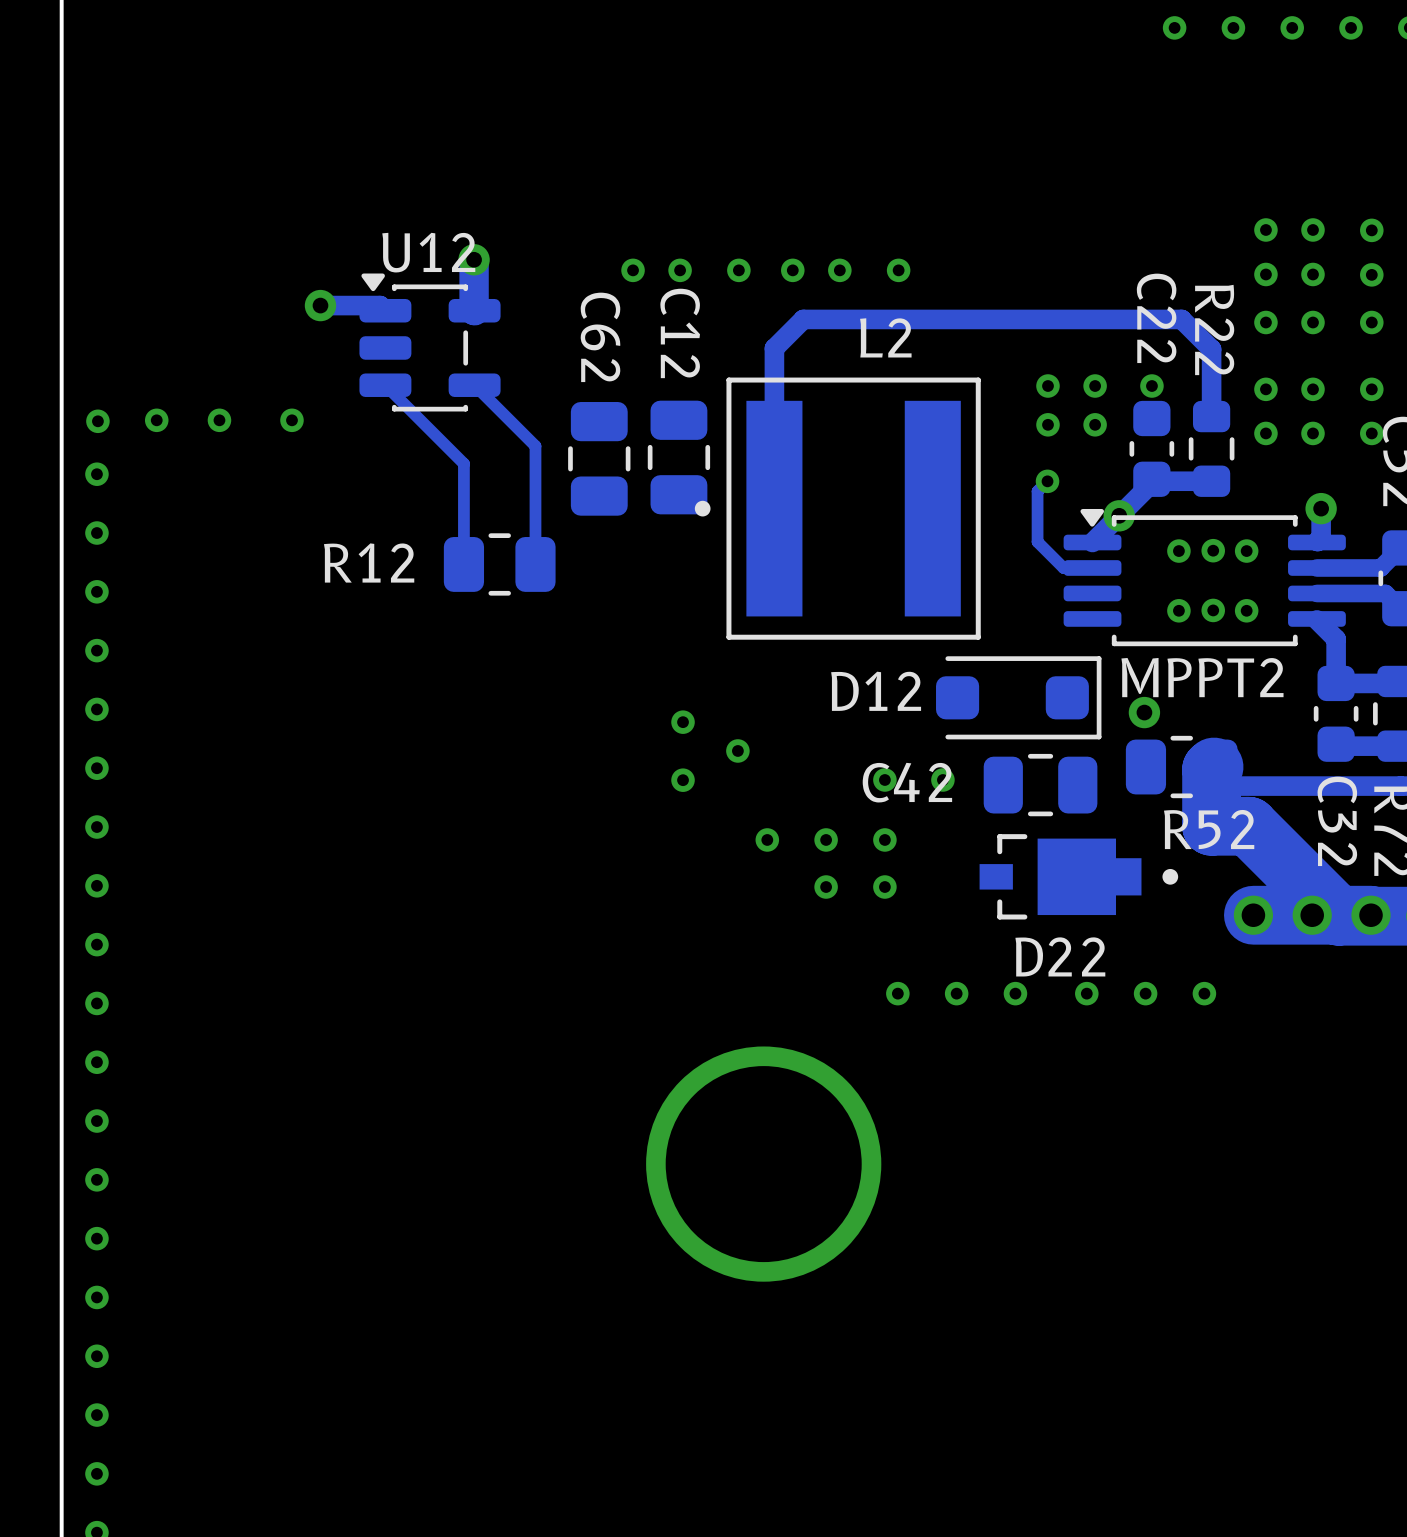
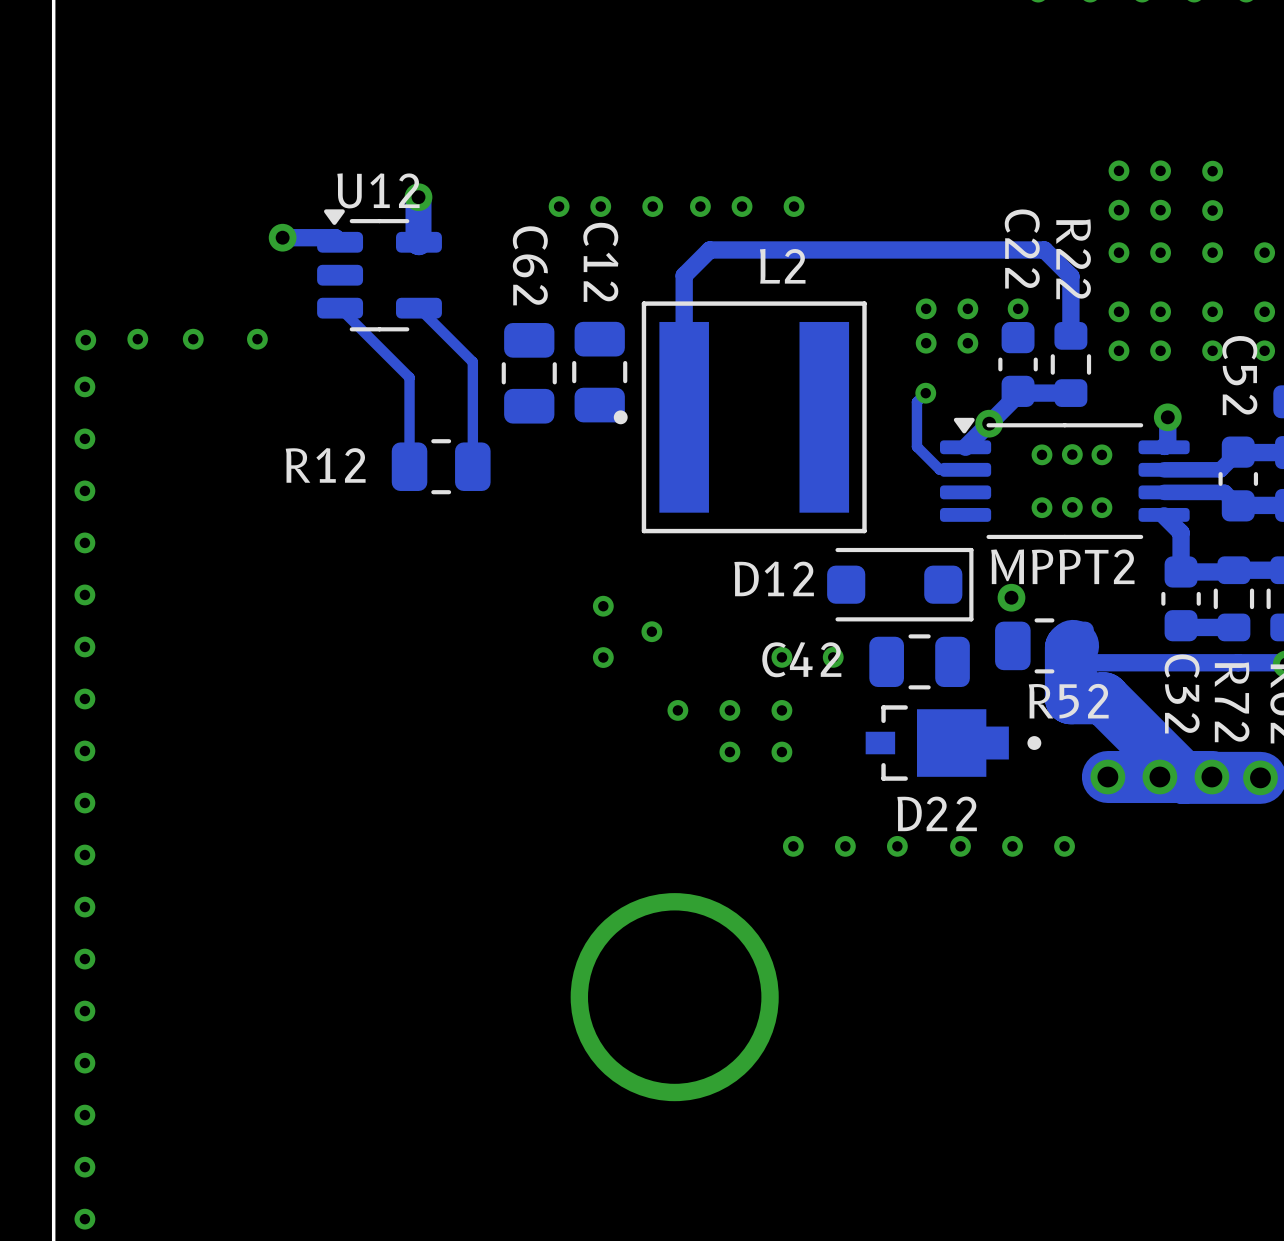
U12 footprint: [359, 273, 501, 412] -> [317, 209, 442, 332]
MPPT2 footprint: [1063, 508, 1346, 647] -> [939, 417, 1190, 540]

